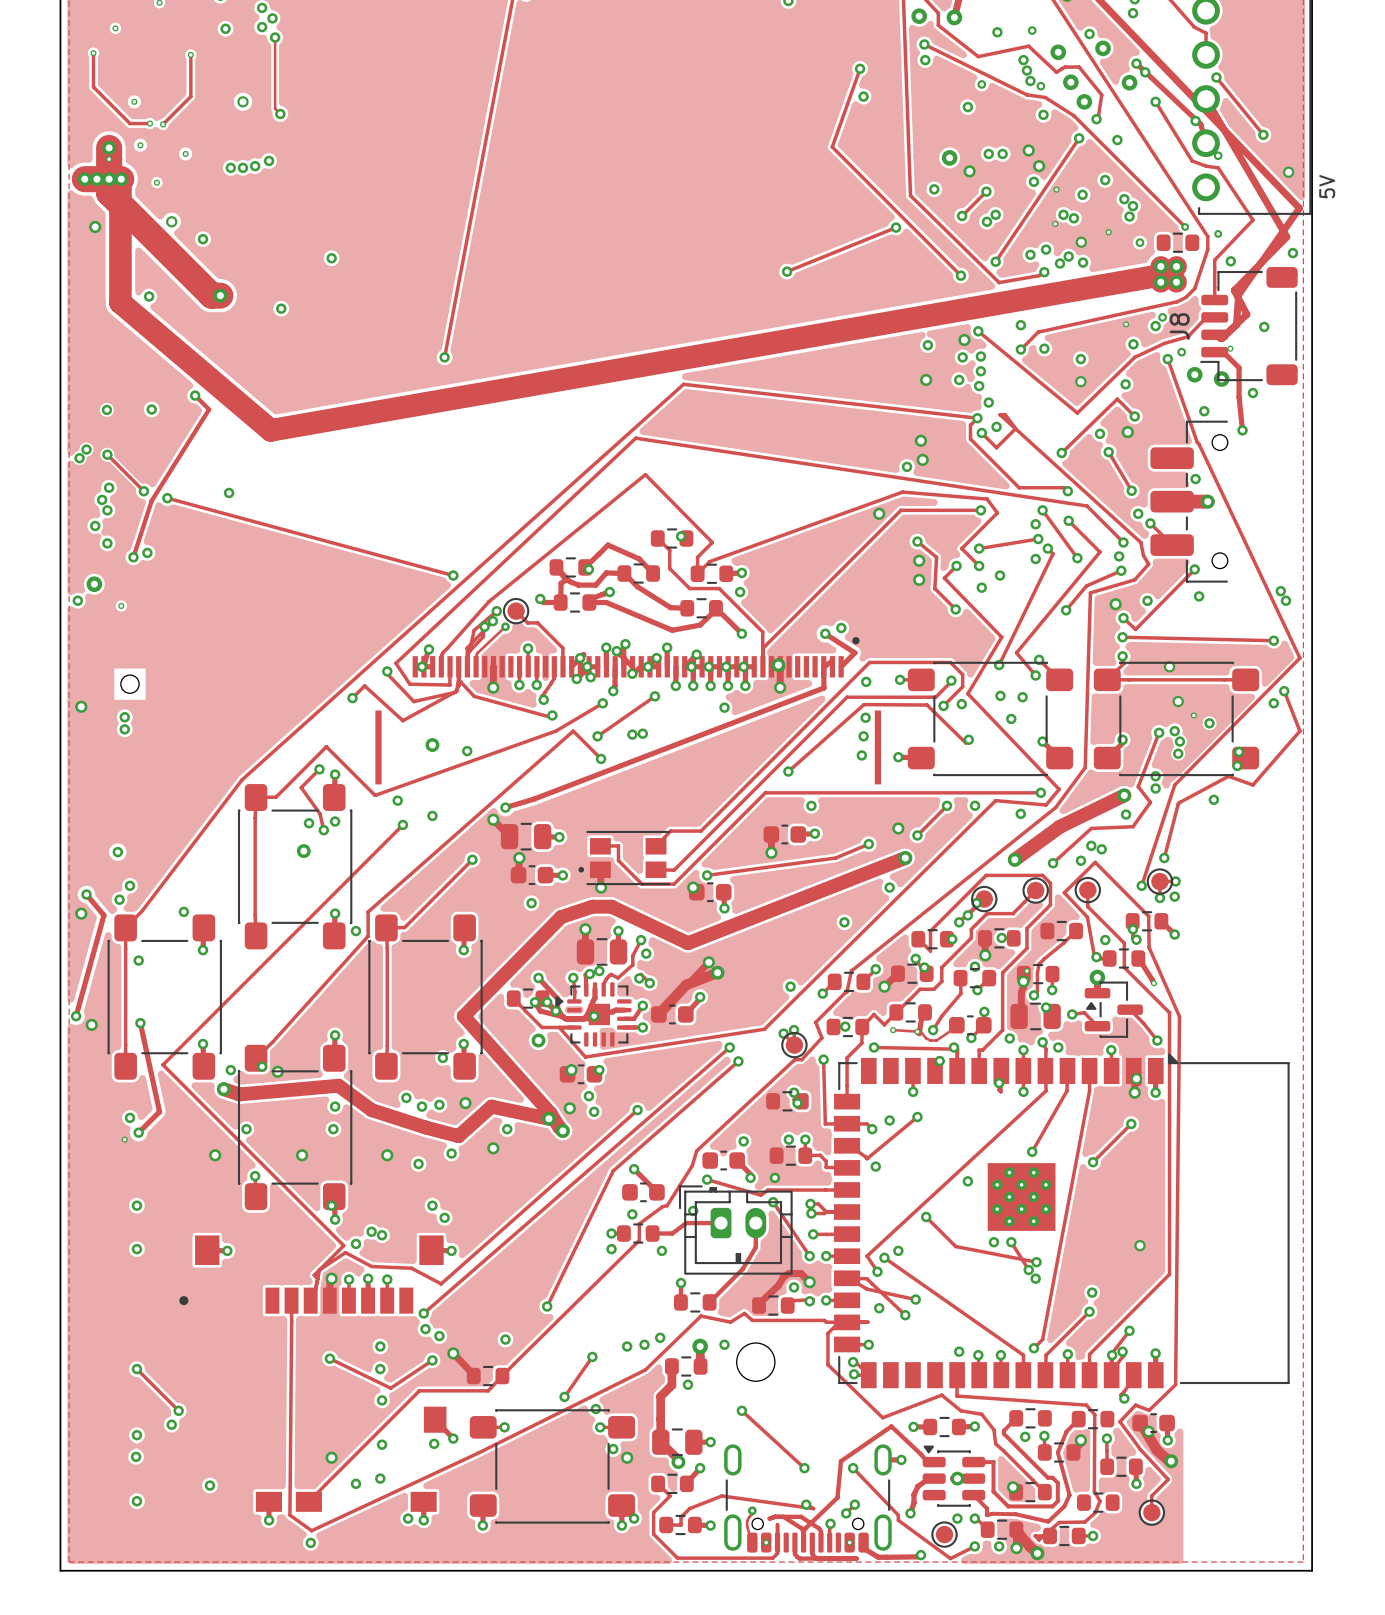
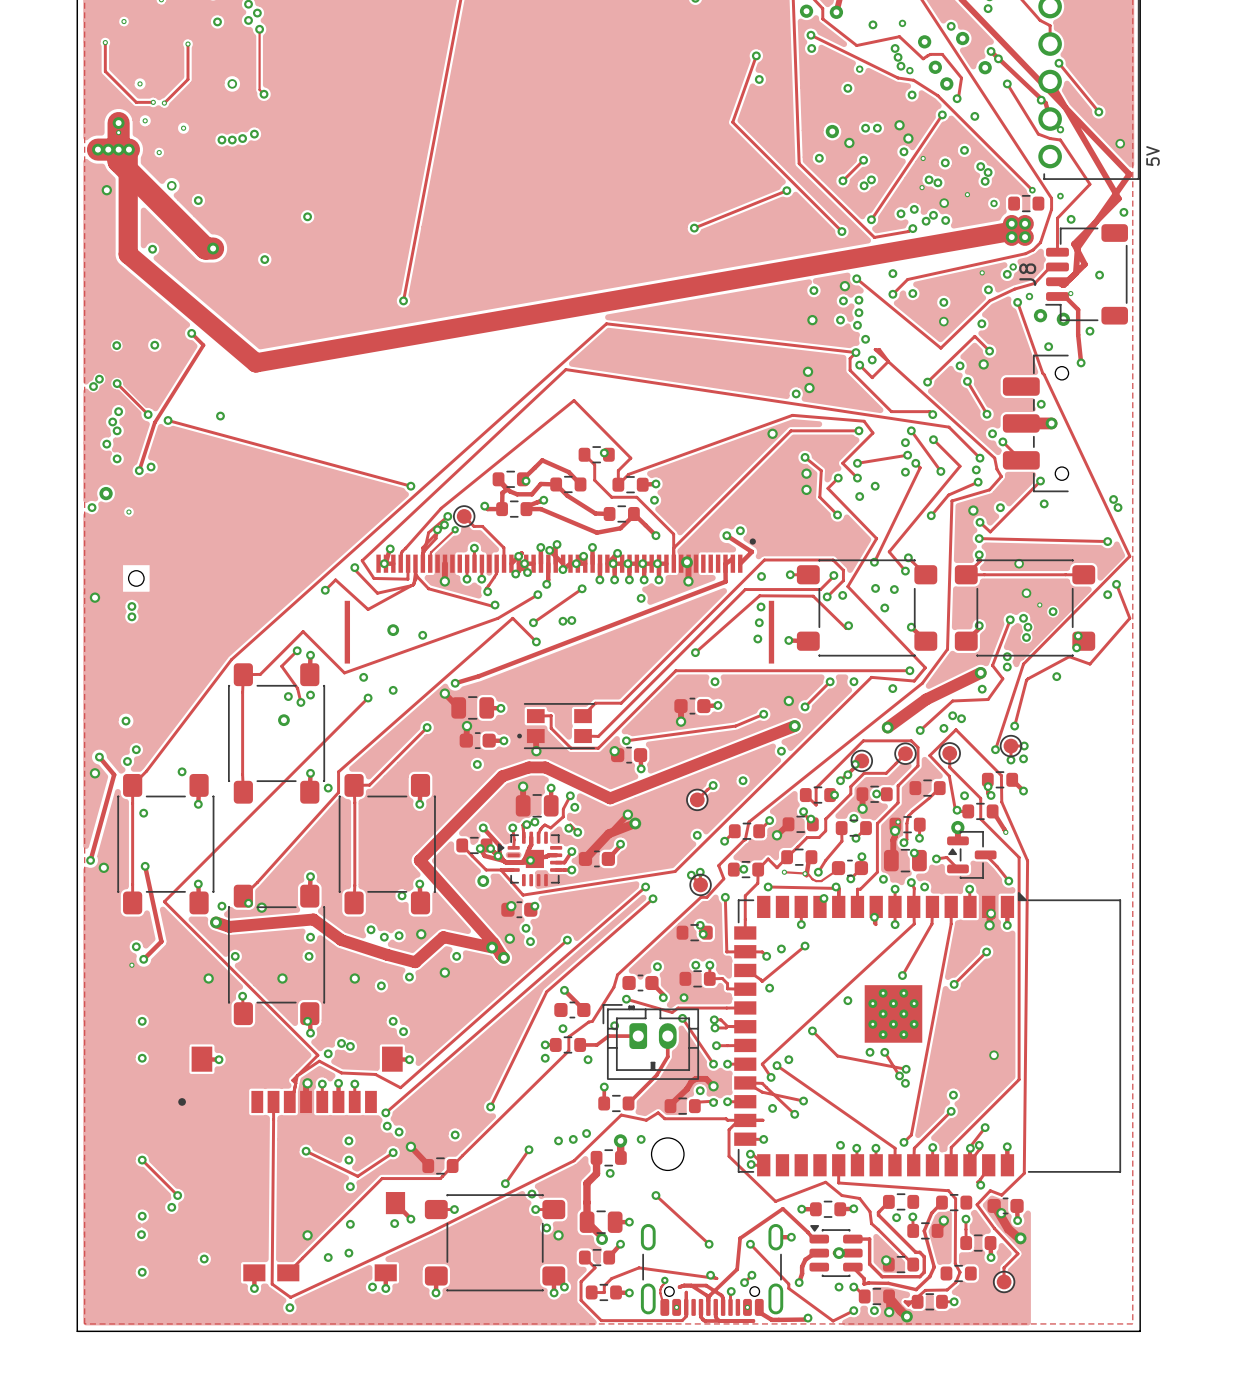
track: none -> (713, 785) (697, 799)
via: none -> (713, 785)
part: none -> (697, 799)
part: (944, 1534) -> none

